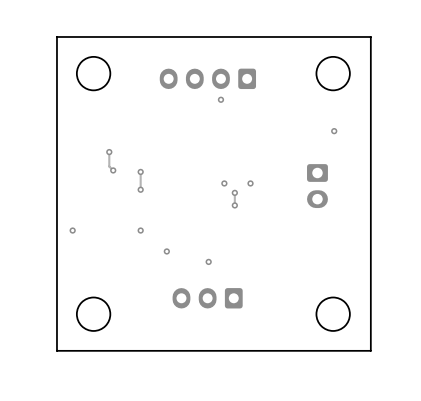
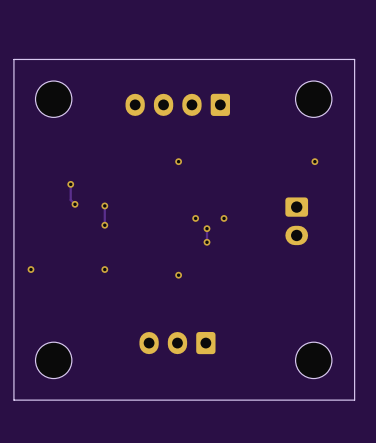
via position: (220, 99) -> (178, 161)
via: none -> (178, 275)
via: (166, 251) -> none
via: (208, 261) -> none

